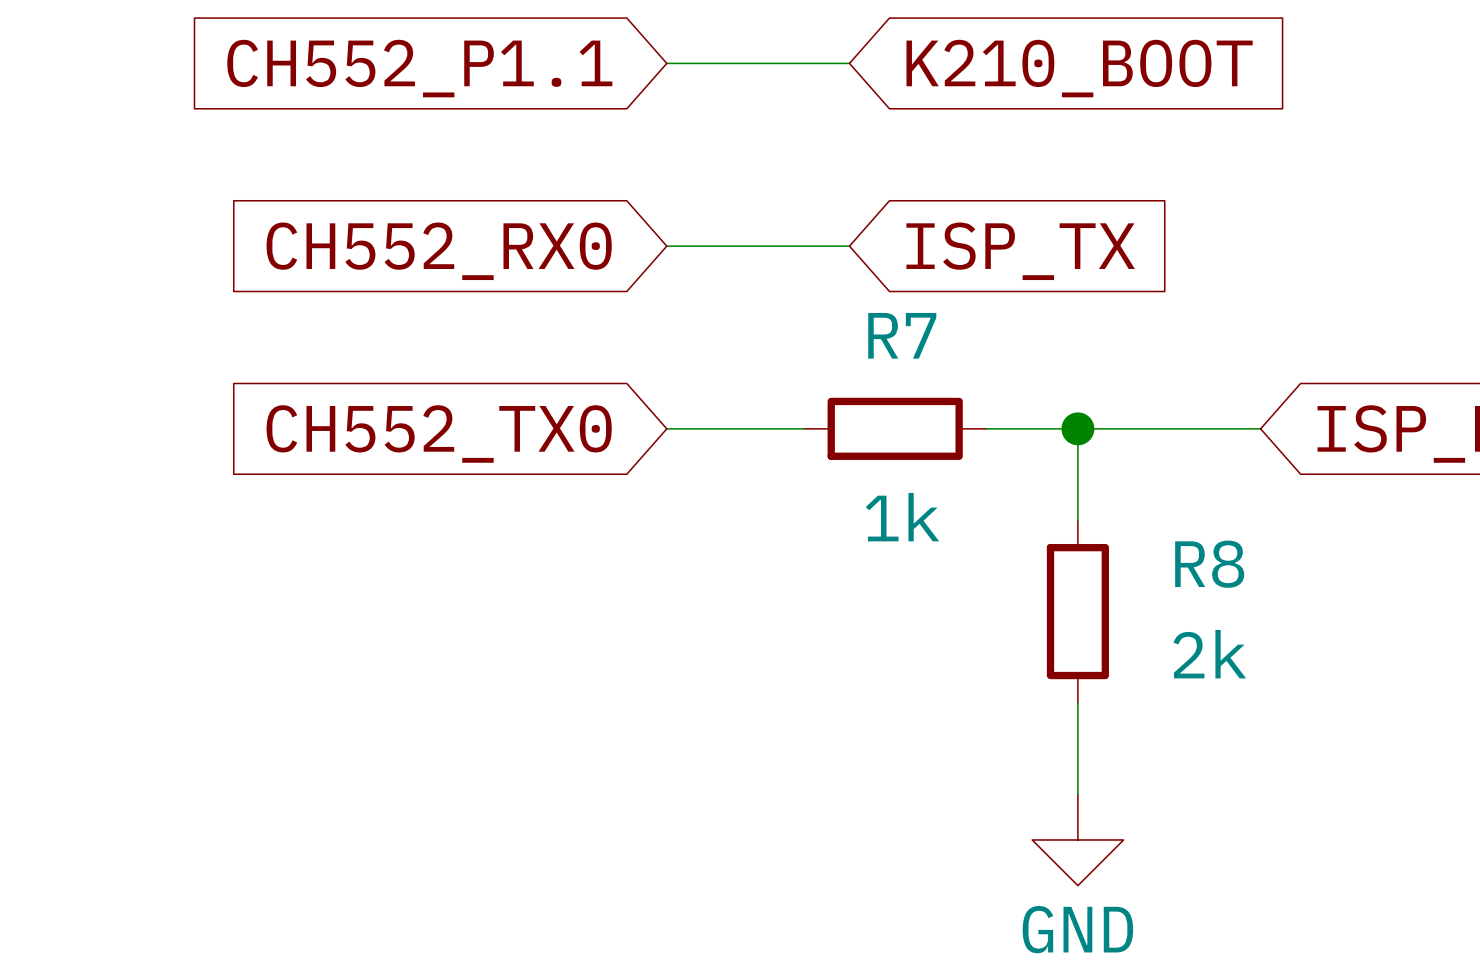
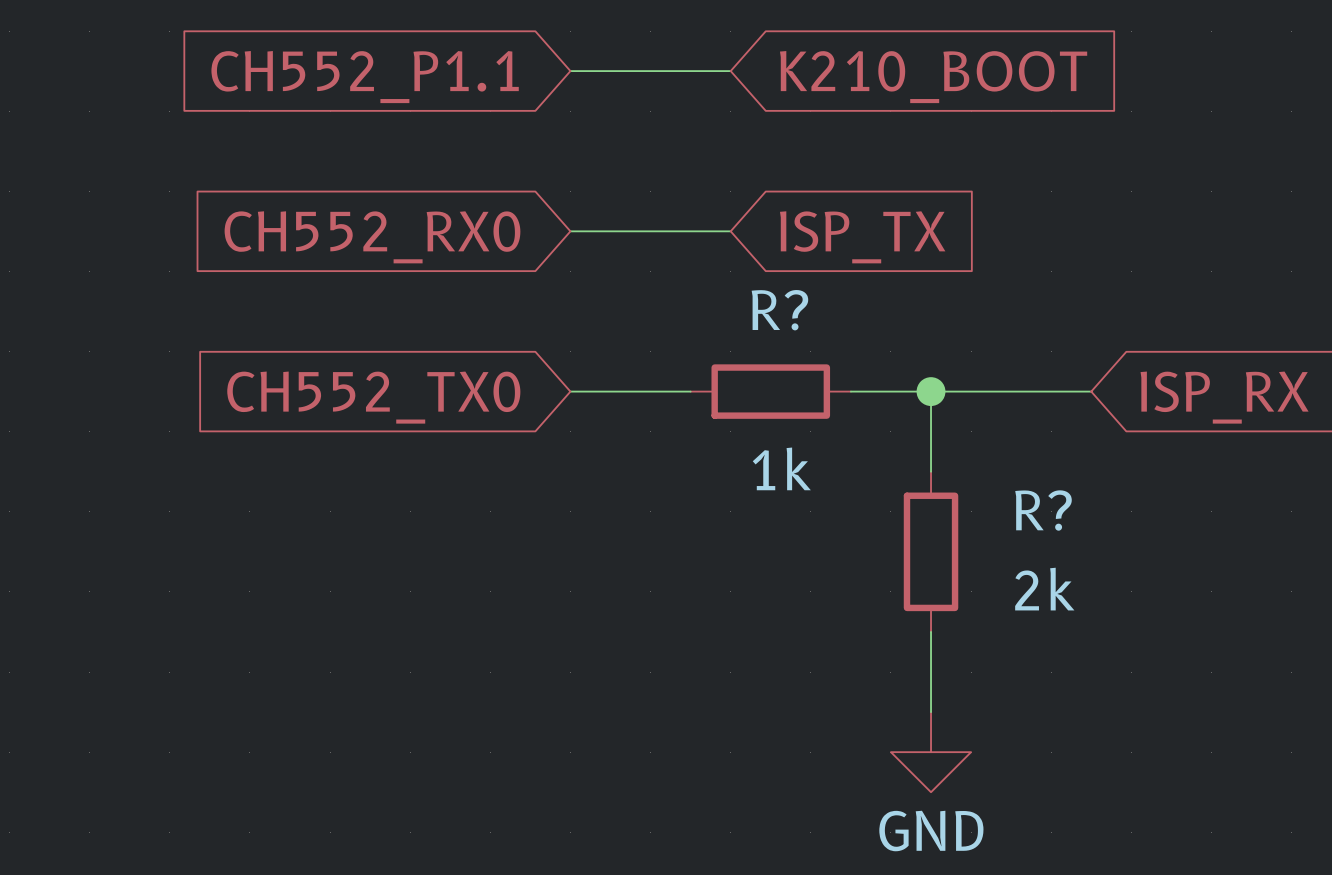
R7 name: R7 (902, 335) -> R? (779, 310)
R8 name: R8 (1209, 564) -> R? (1043, 510)

